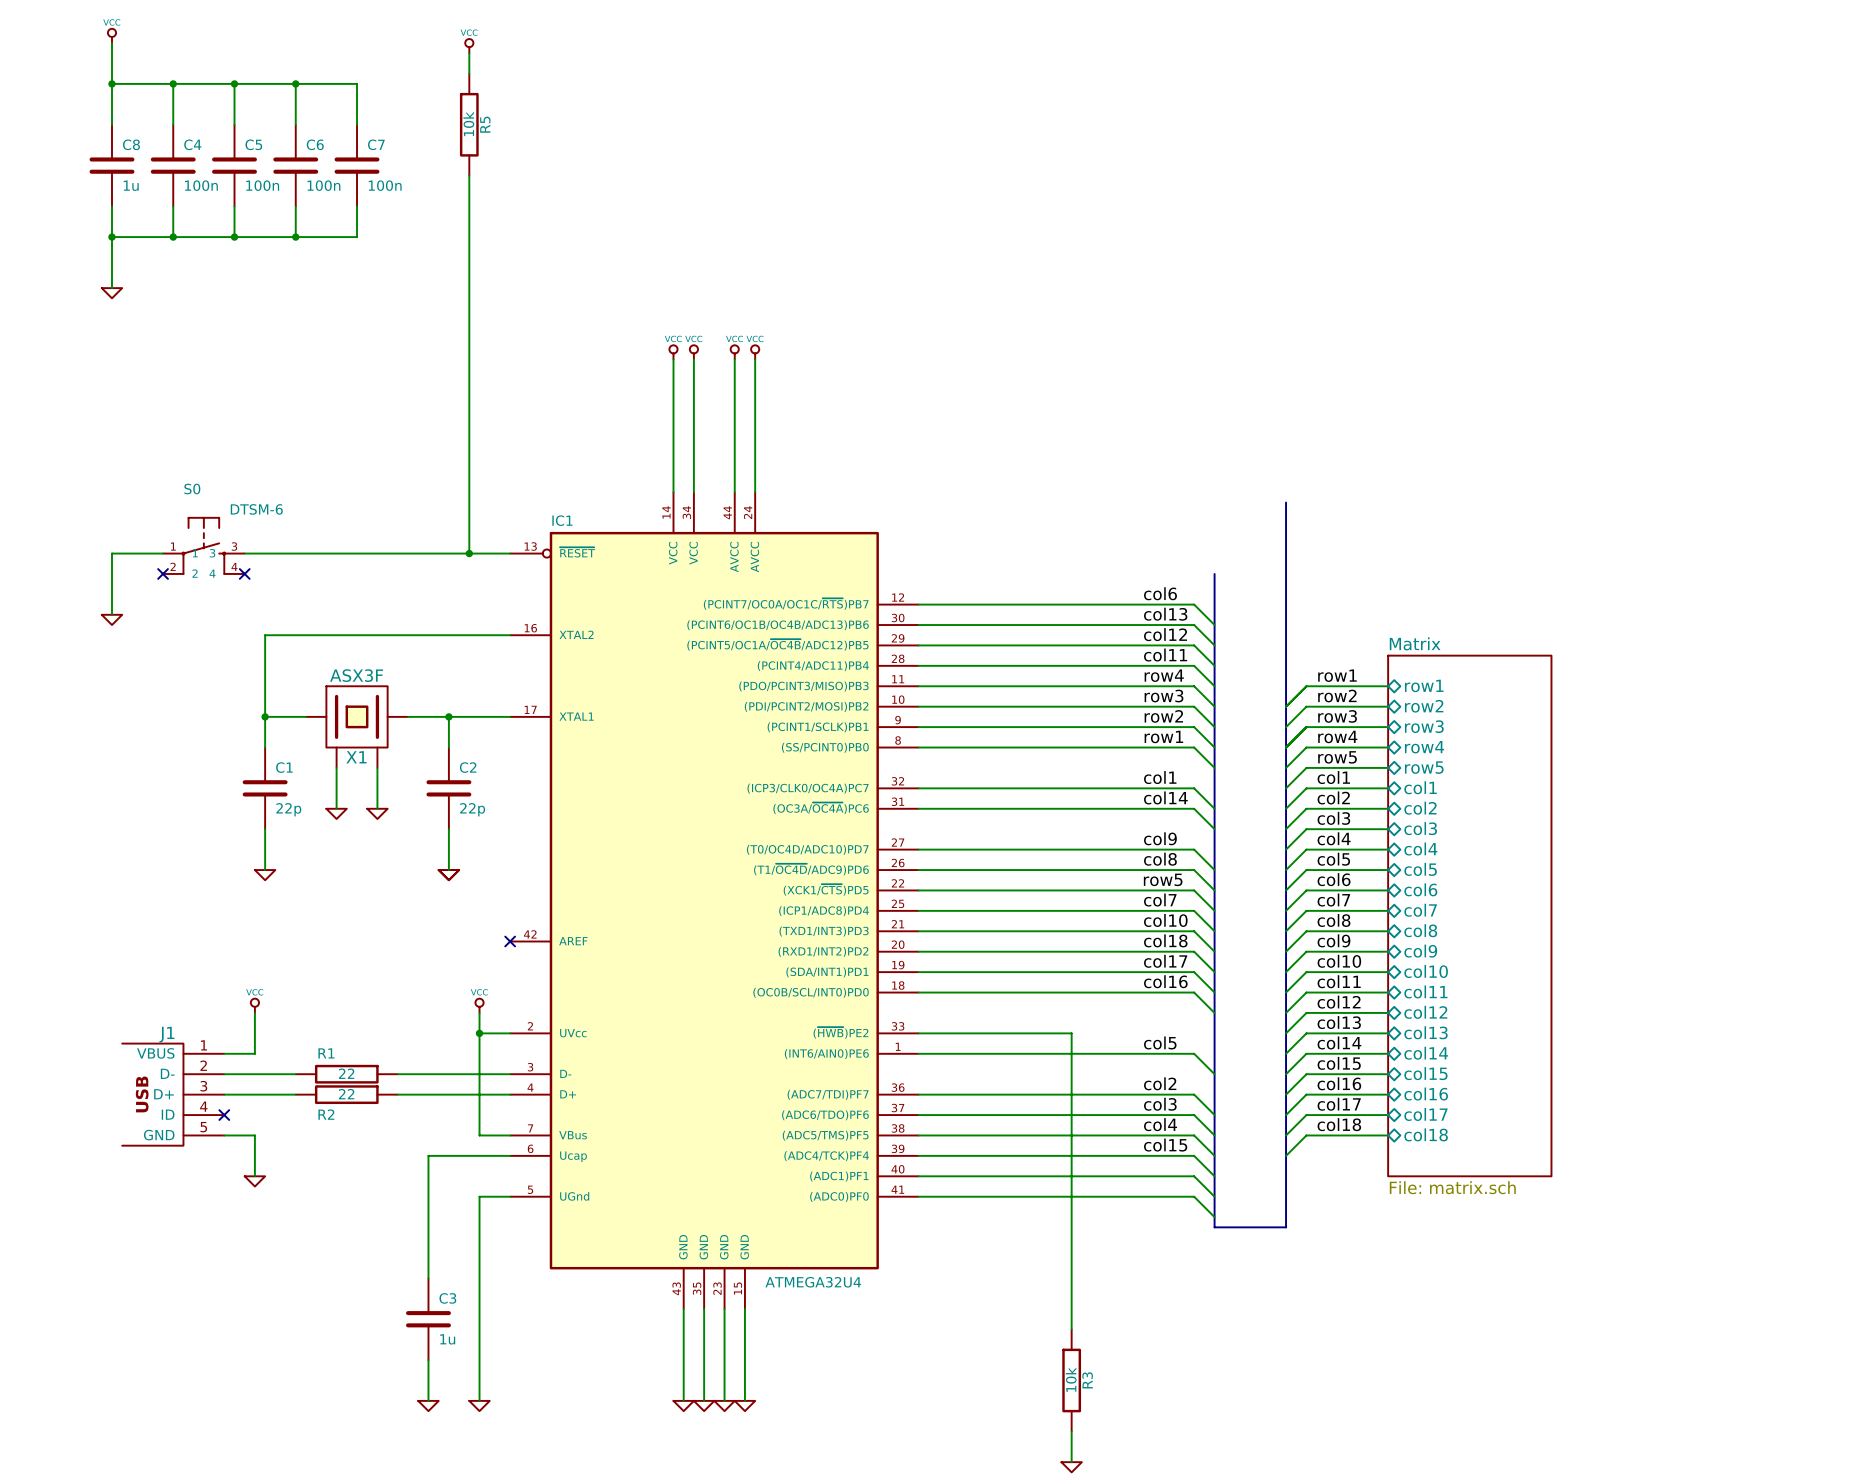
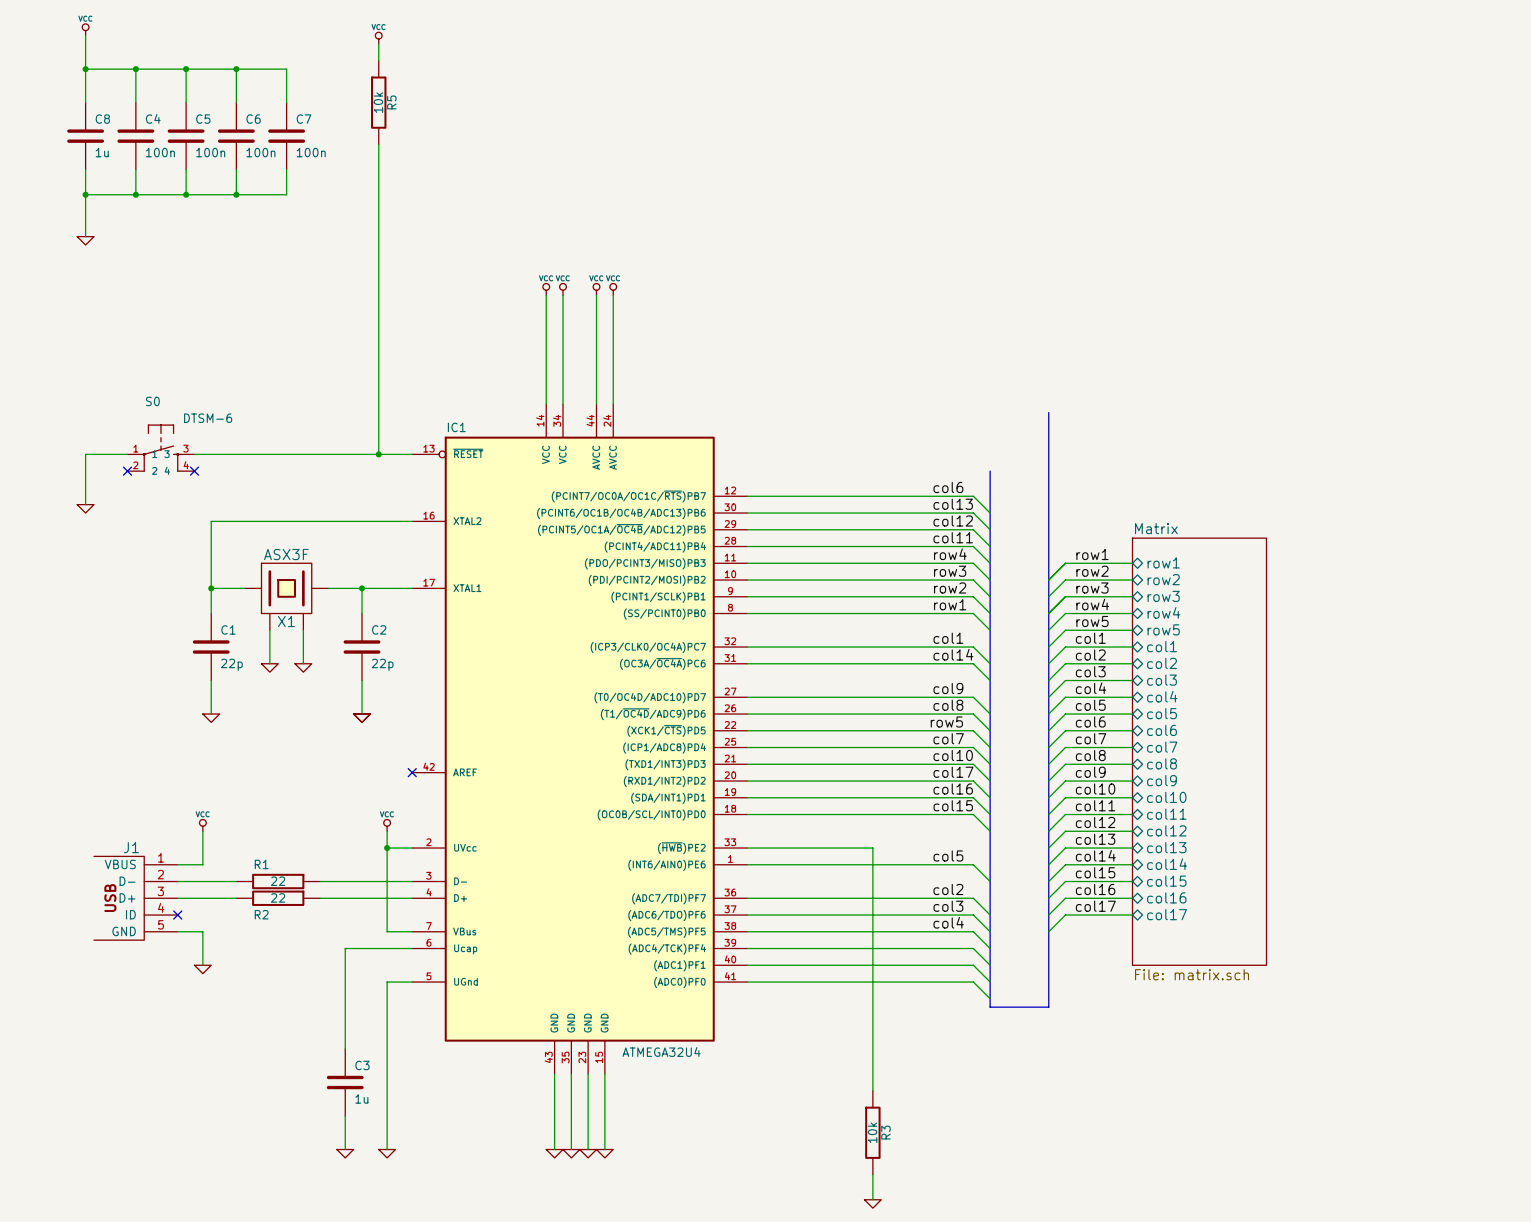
label: col18 (1165, 940) -> col17 (953, 772)
label: col17 (1165, 961) -> col16 (953, 789)
label: col16 (1165, 981) -> col15 (953, 805)
label: col18 (1339, 1124) -> none
sheet pin: col18 (1426, 1134) -> none
wire: (1388, 1135) (1306, 1135) (1286, 1155) -> none
label: col15 (1165, 1145) -> none

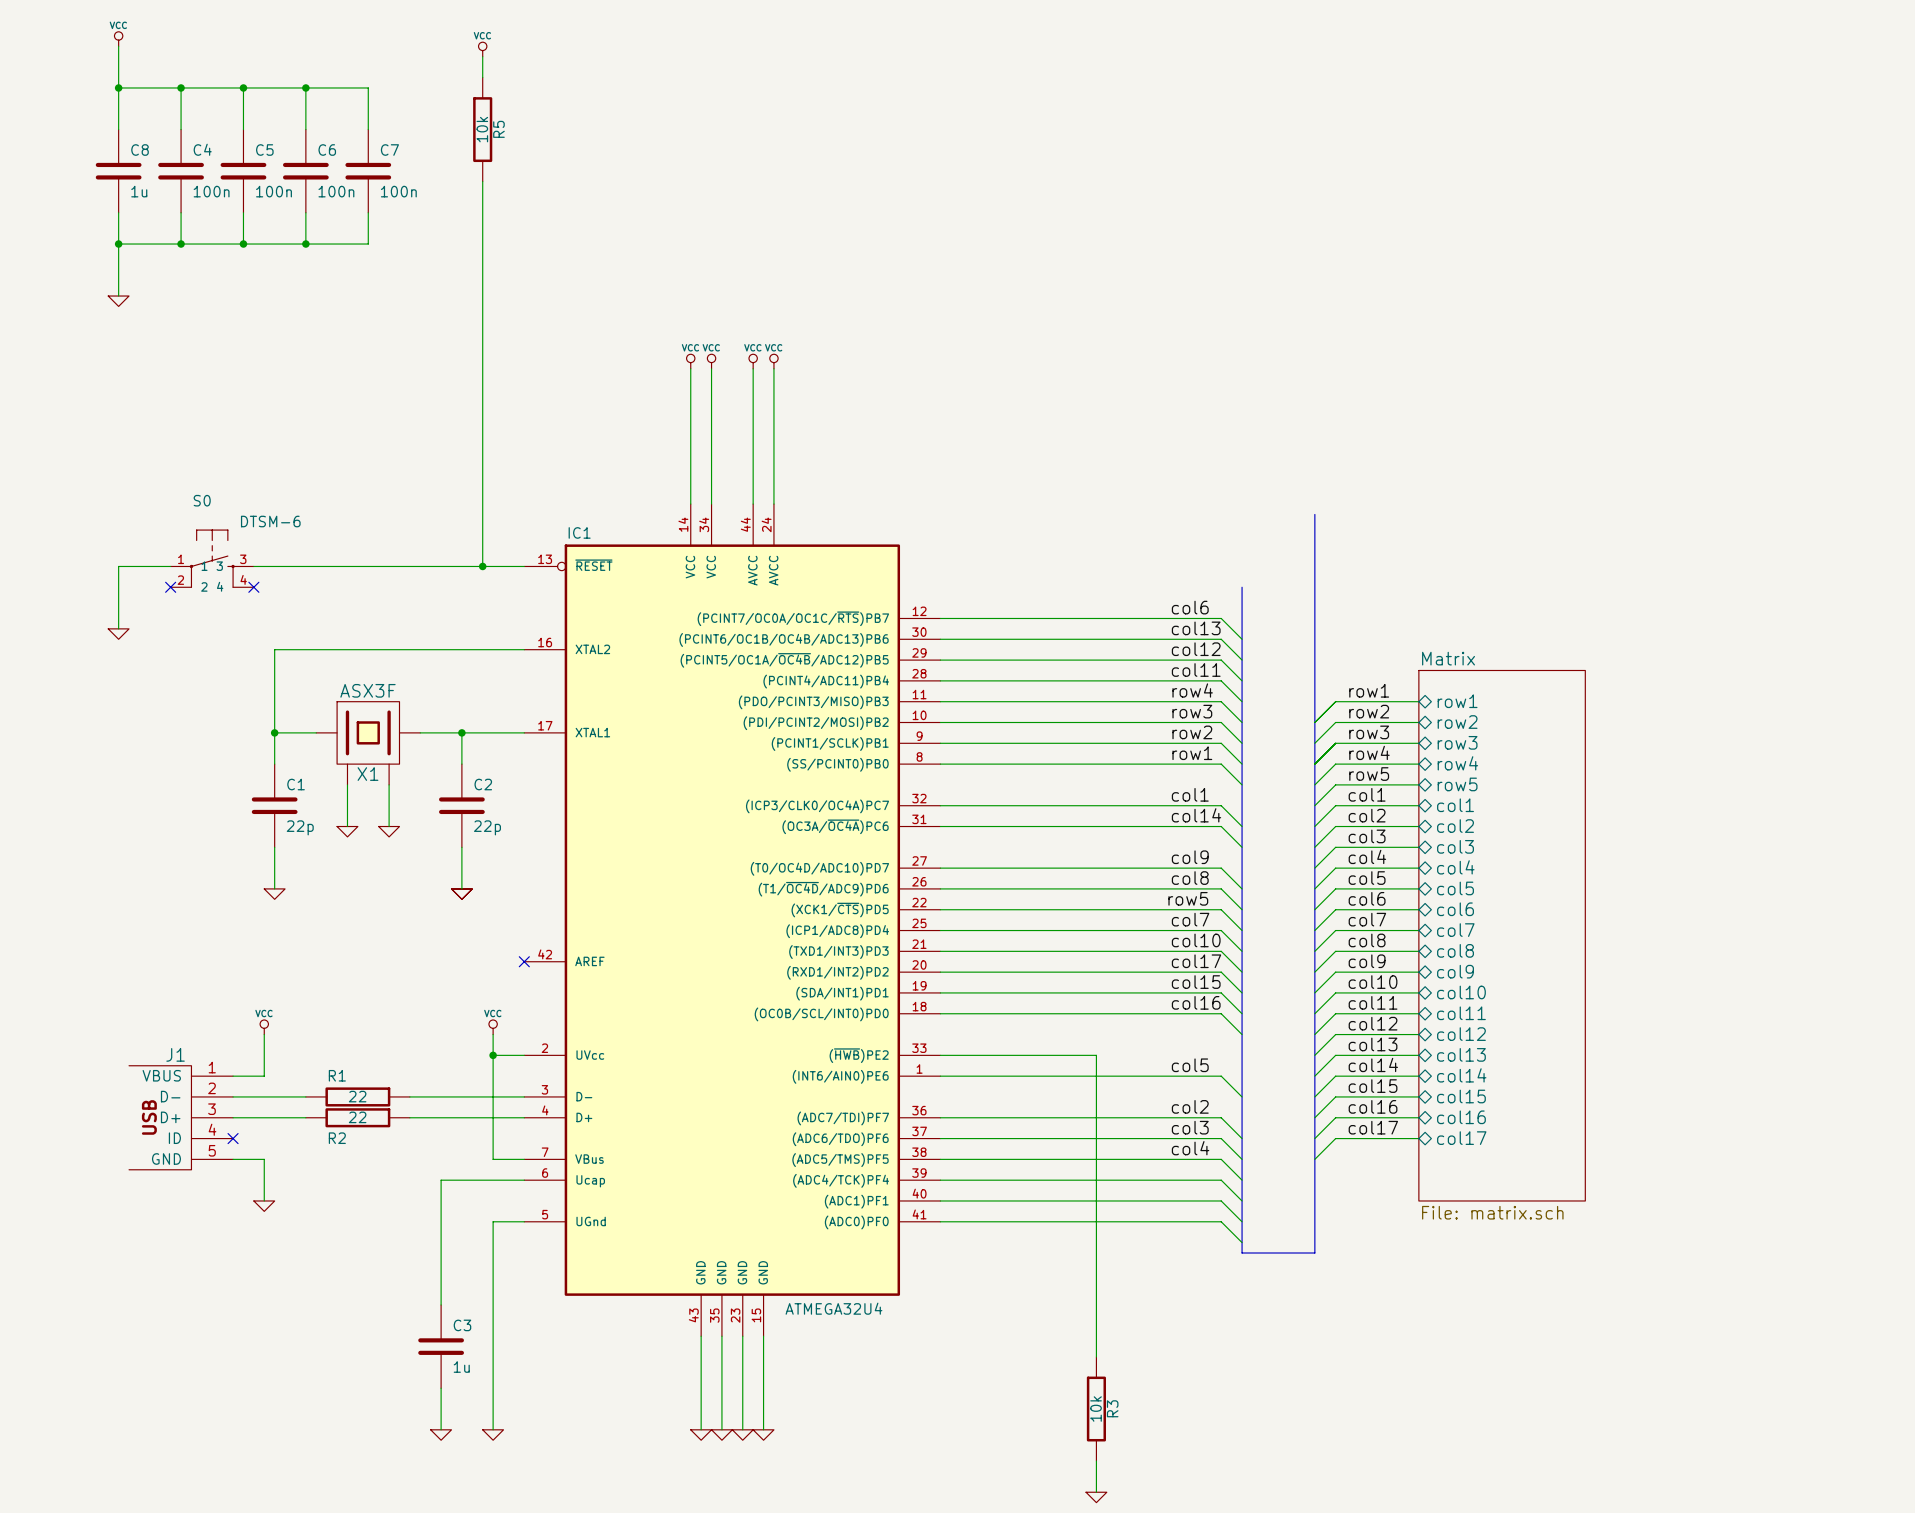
label: col16 (953, 789) -> col15 (1196, 982)
label: col15 (953, 805) -> col16 (1196, 1002)

